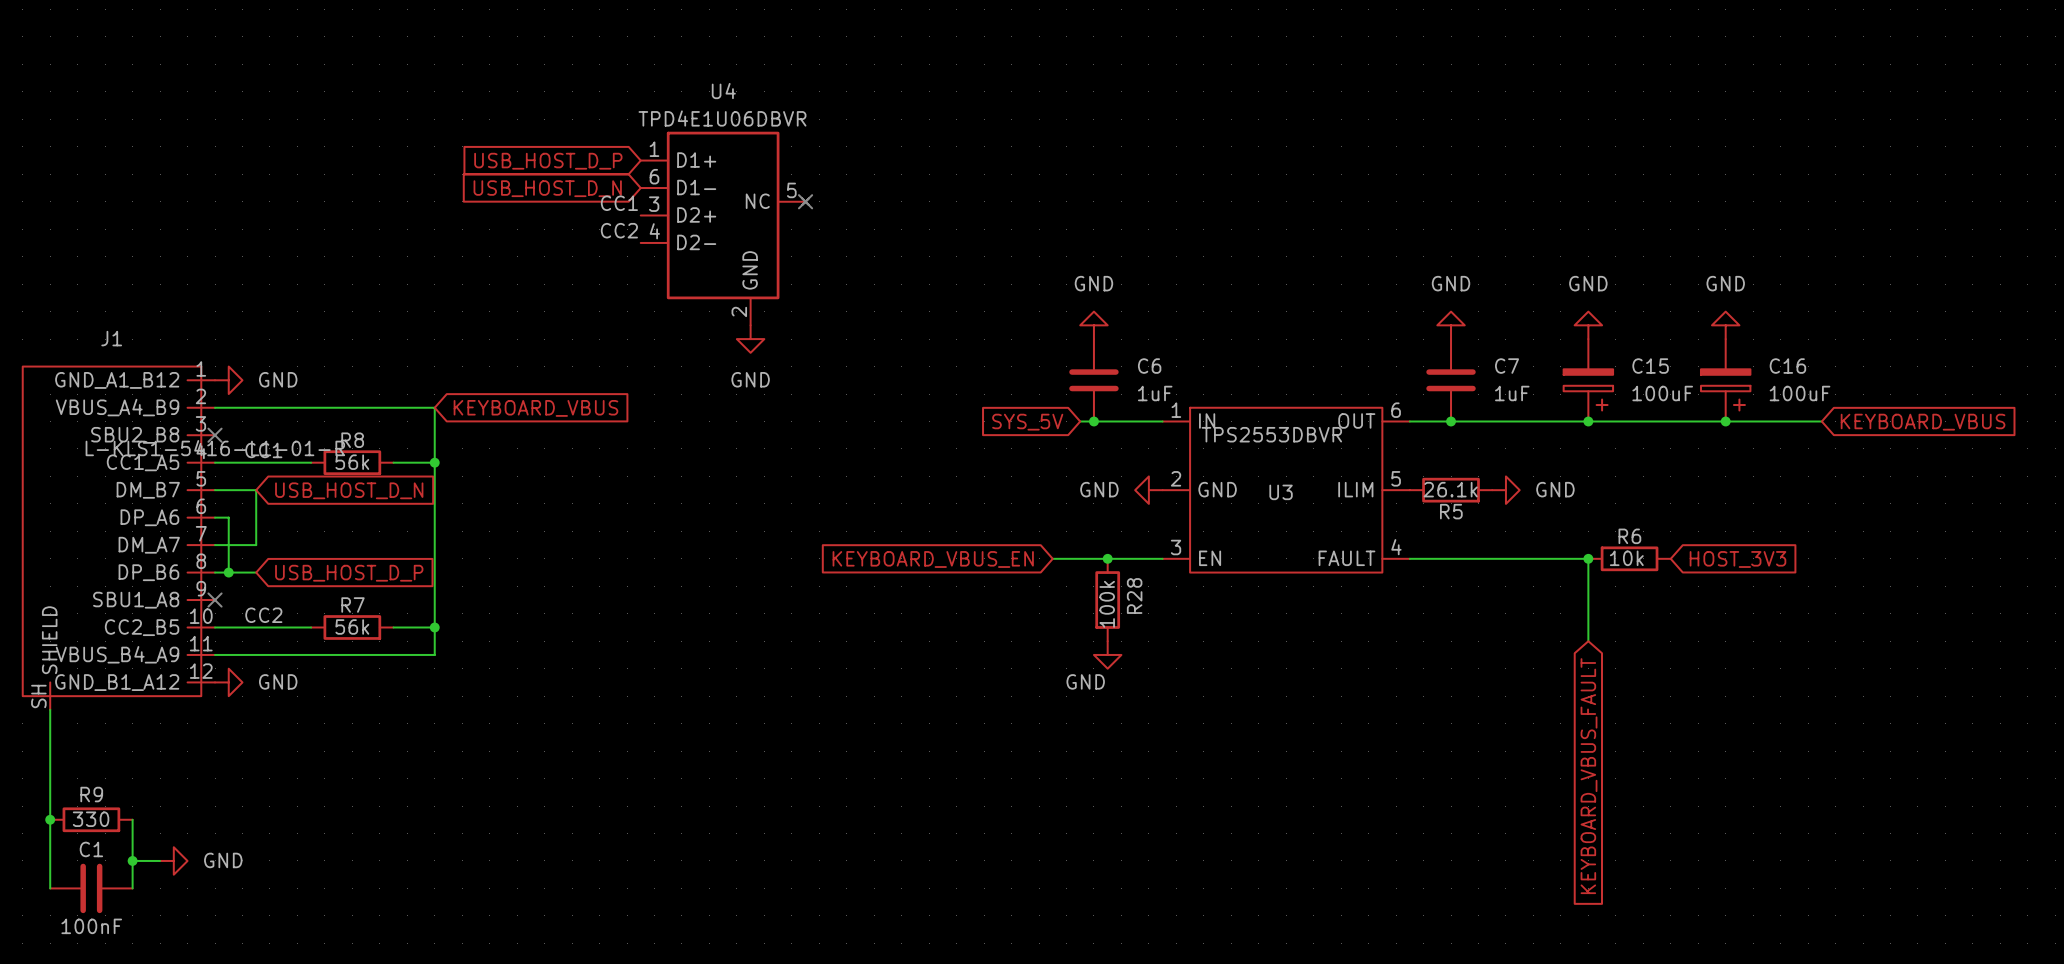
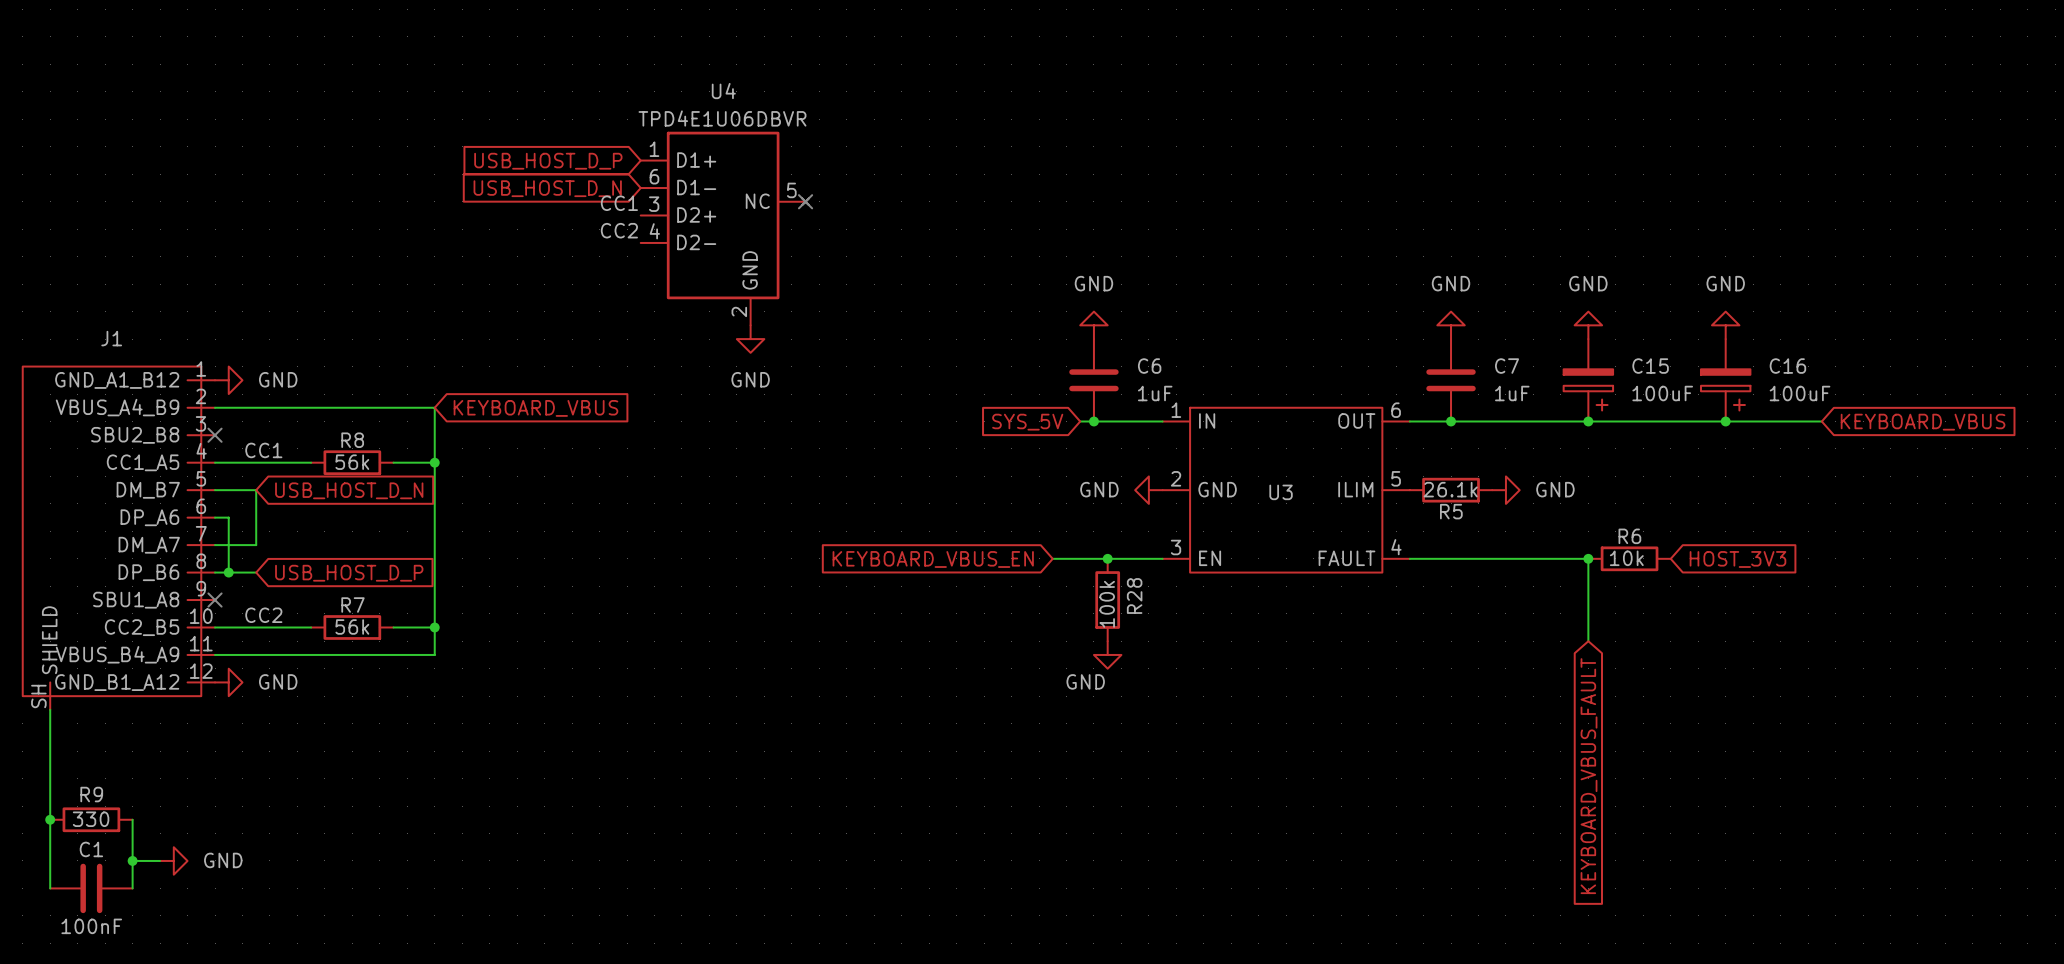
U3 value: TPS2553DBVR (1271, 434) -> none
J1 value: L-KLS1-5416-L1-01-R (215, 448) -> none

